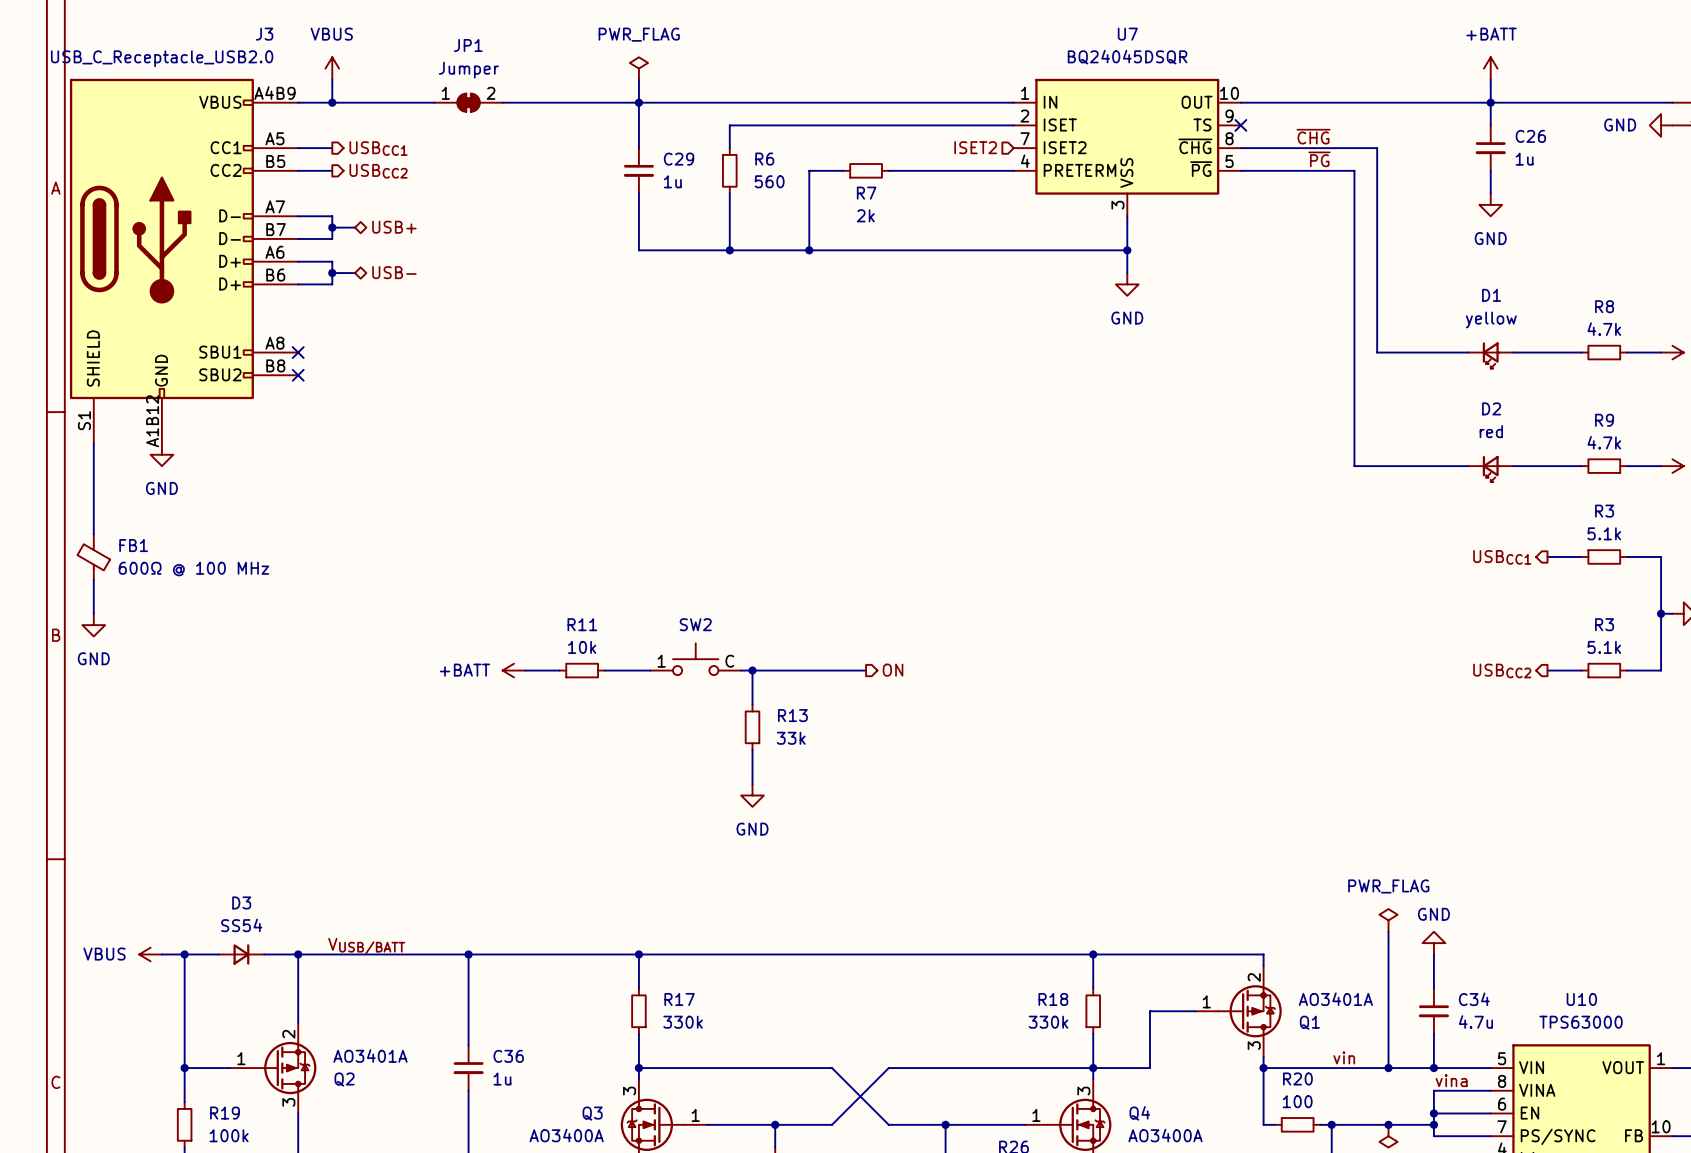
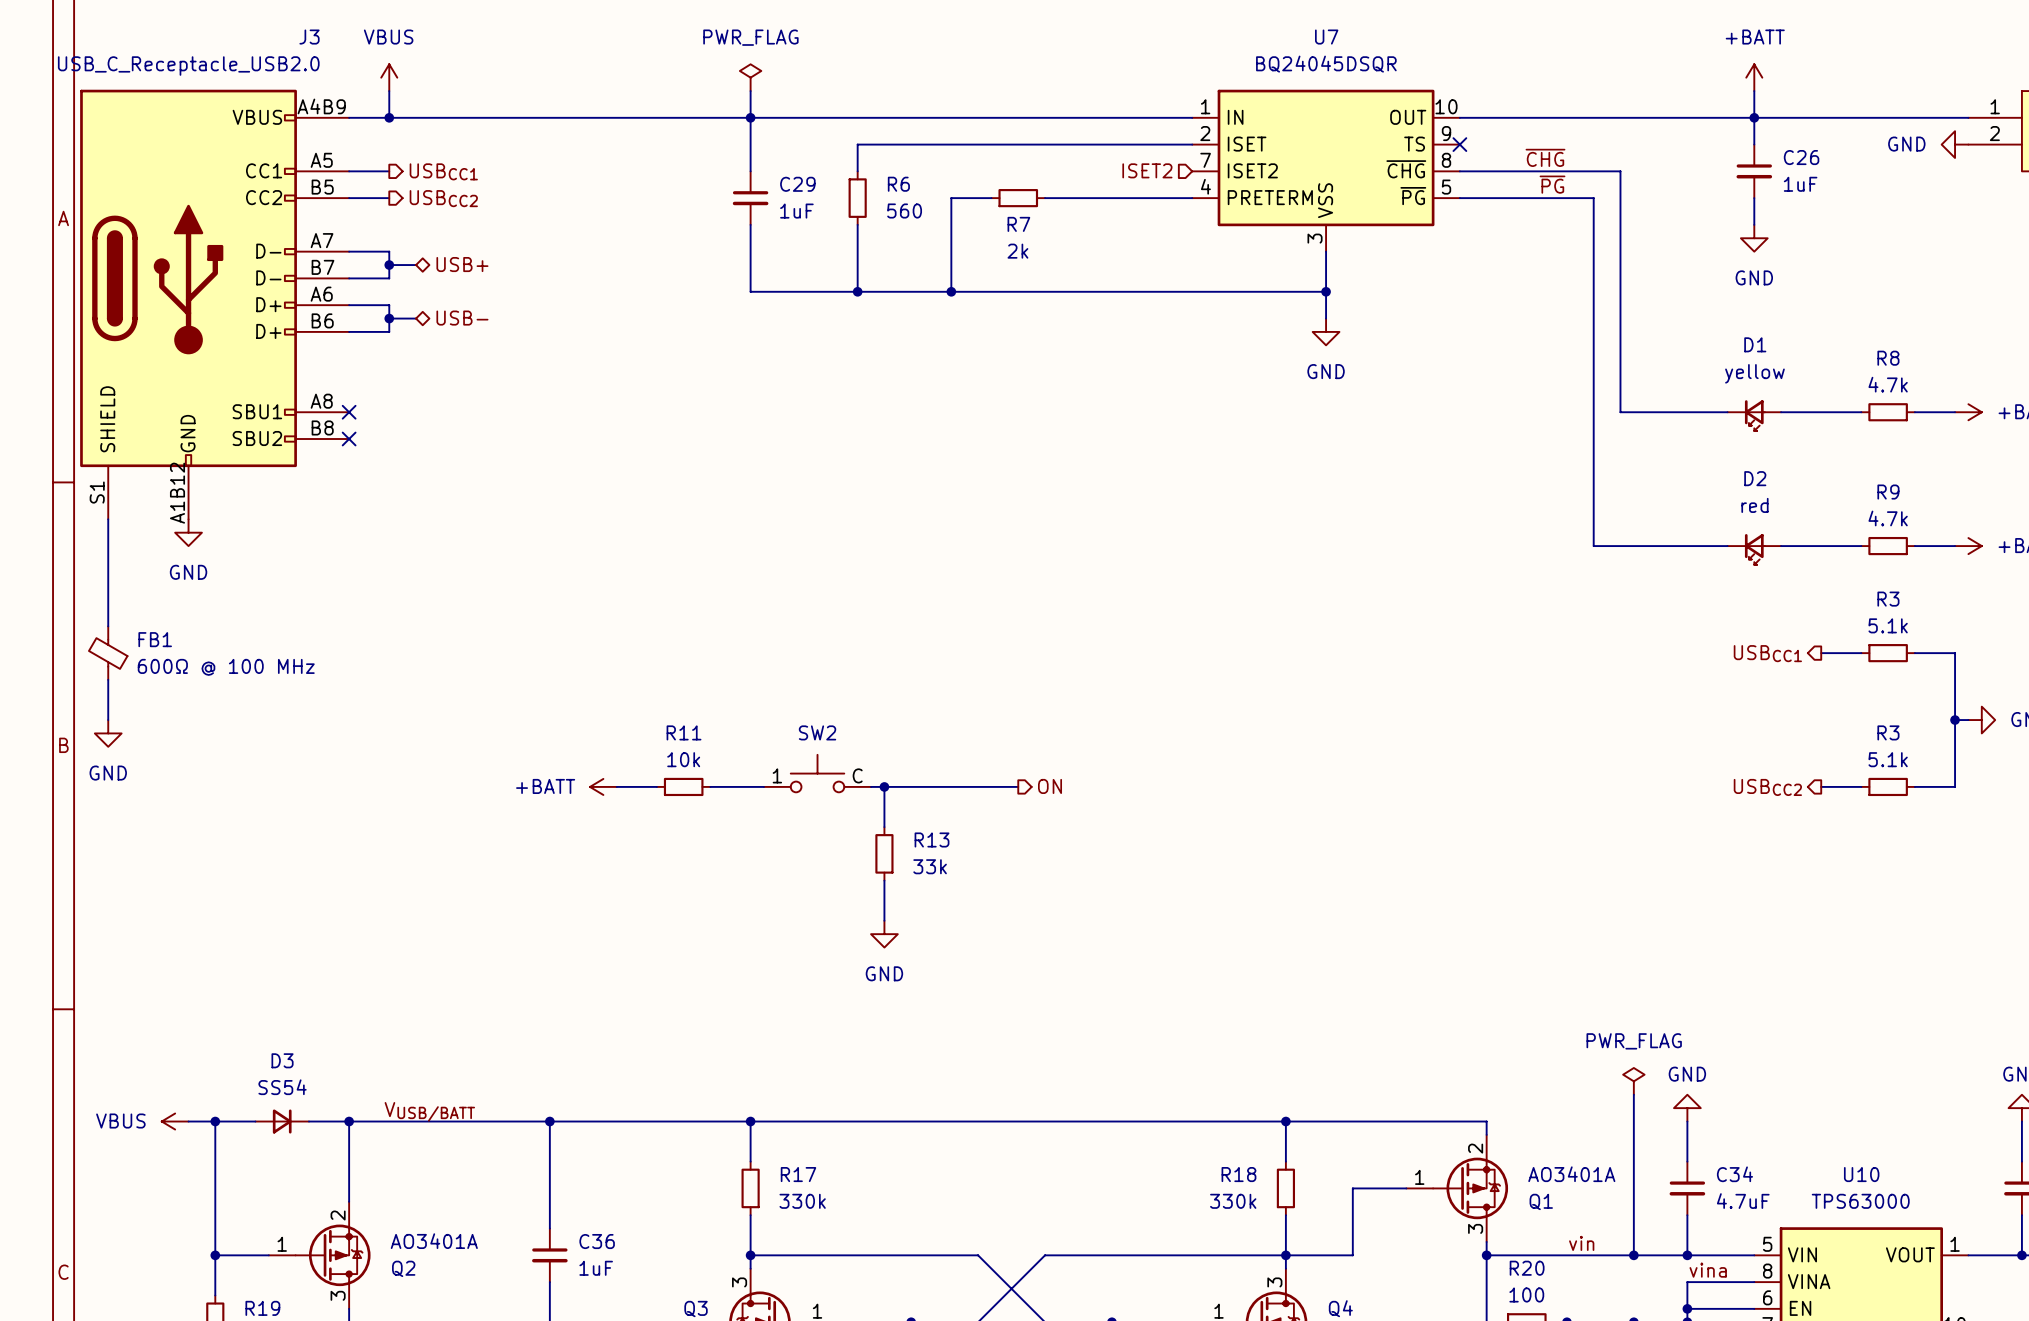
JP1: Jumper (468, 102) -> none
C26 value: 1u (1524, 159) -> 1uF (1800, 184)
C29 value: 1u (672, 181) -> 1uF (796, 211)
C34 value: 4.7u (1475, 1021) -> 4.7uF (1743, 1201)
C36 value: 1u (502, 1079) -> 1uF (596, 1268)

